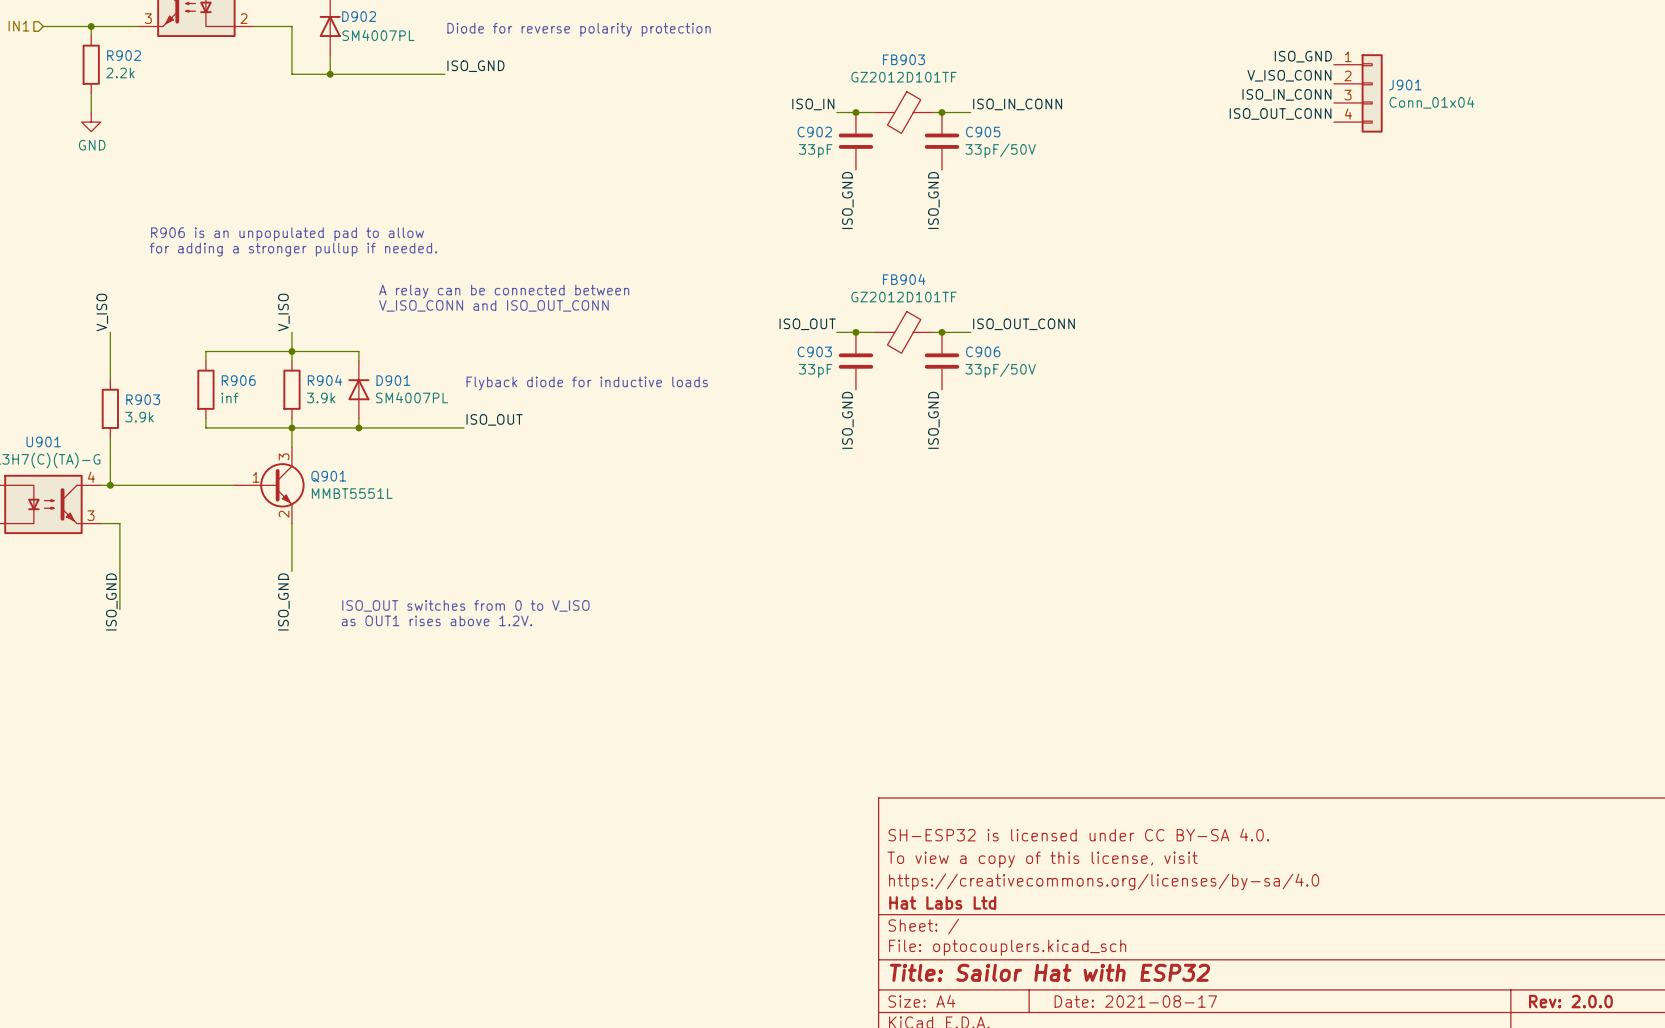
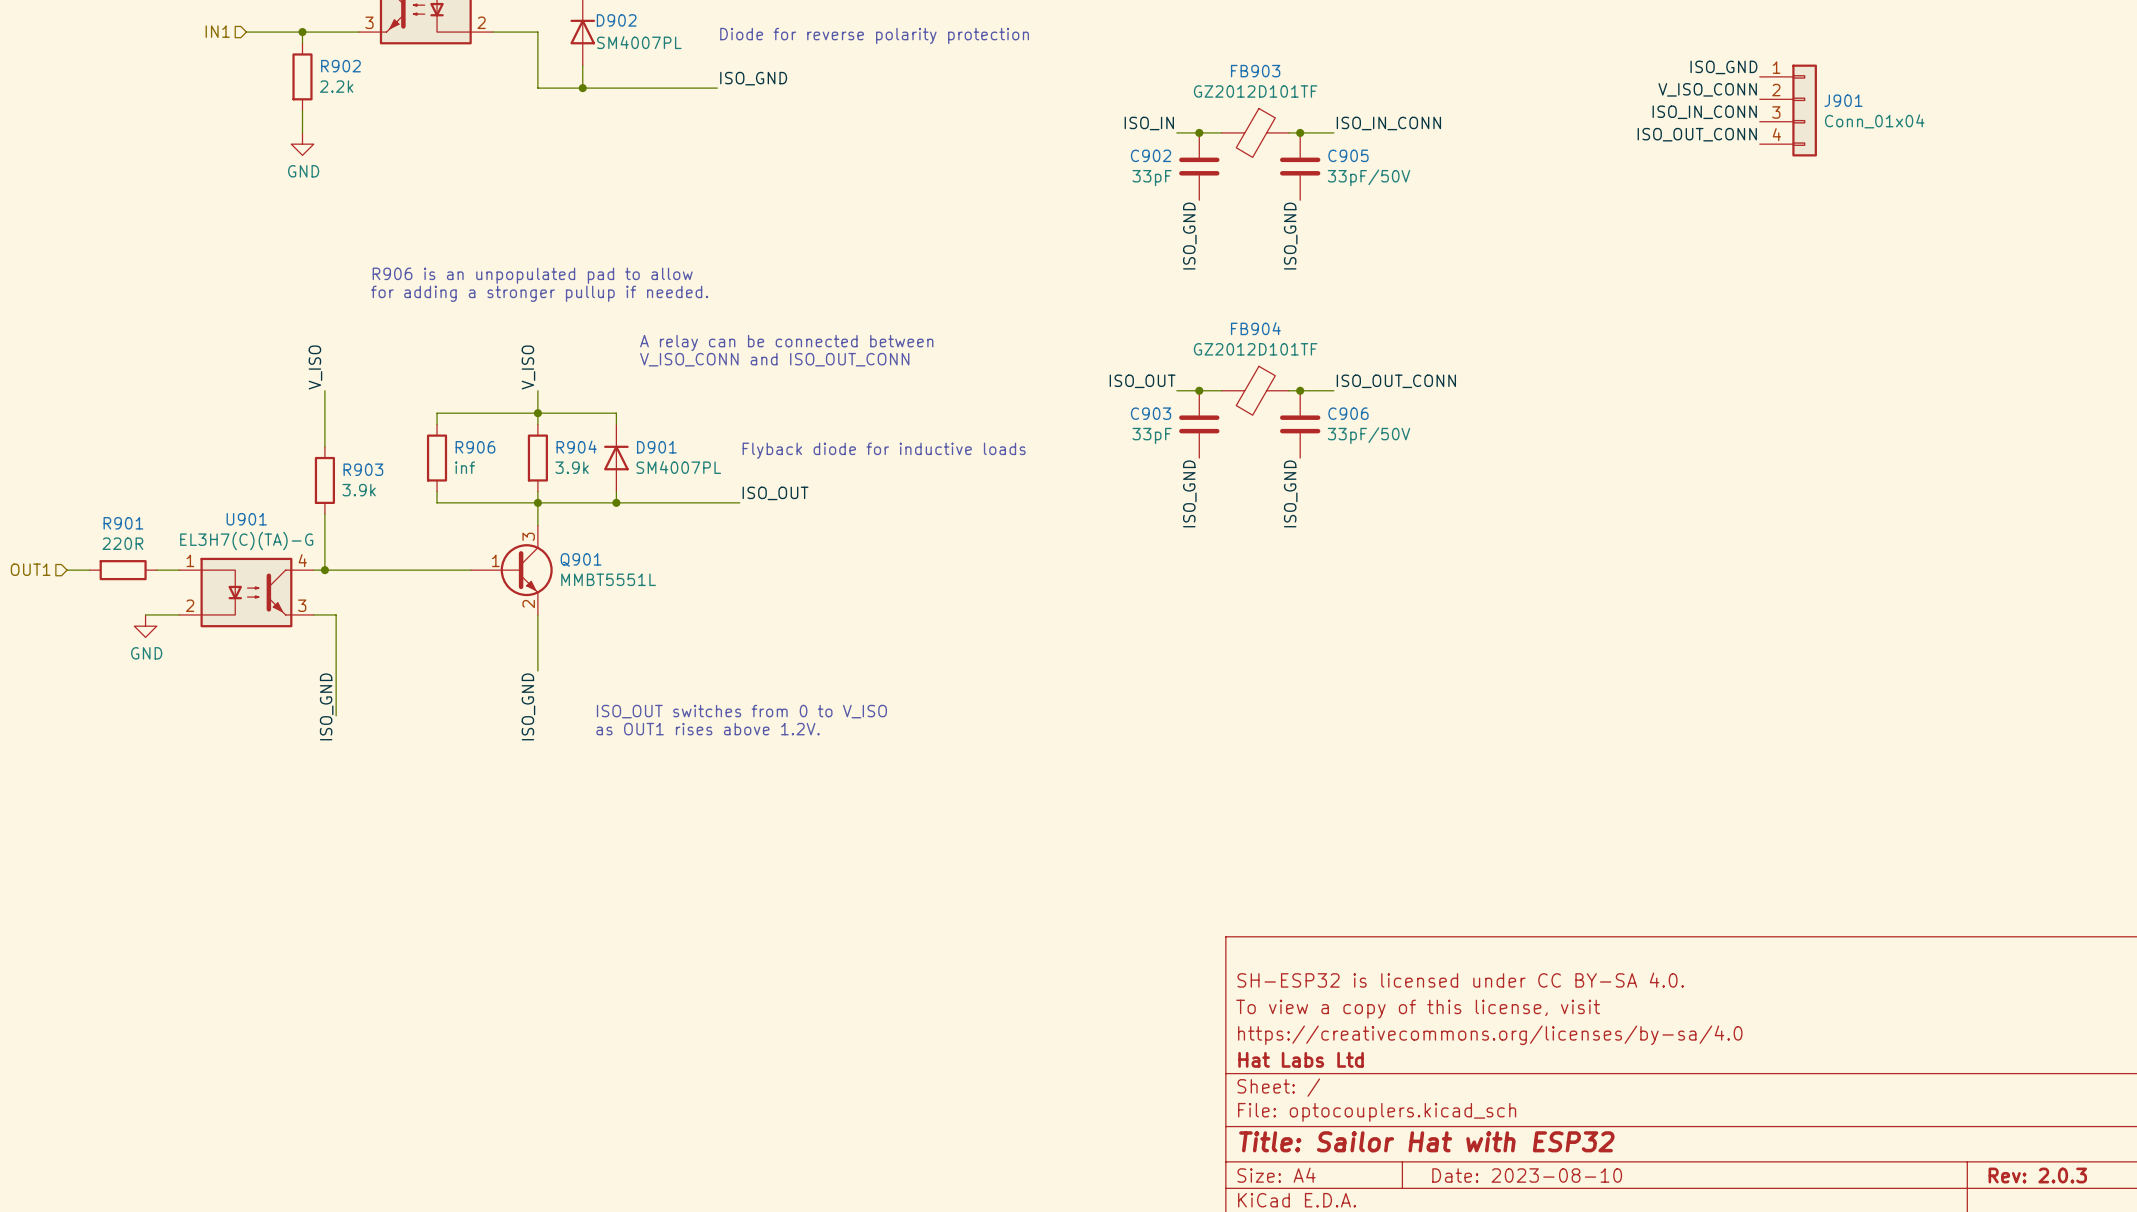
title block: Date: 2021-08-17 (1135, 1001) -> Date: 2023-08-10 (1527, 1175)
title block: Rev: 2.0.0 (1570, 1001) -> Rev: 2.0.3 (2037, 1175)

